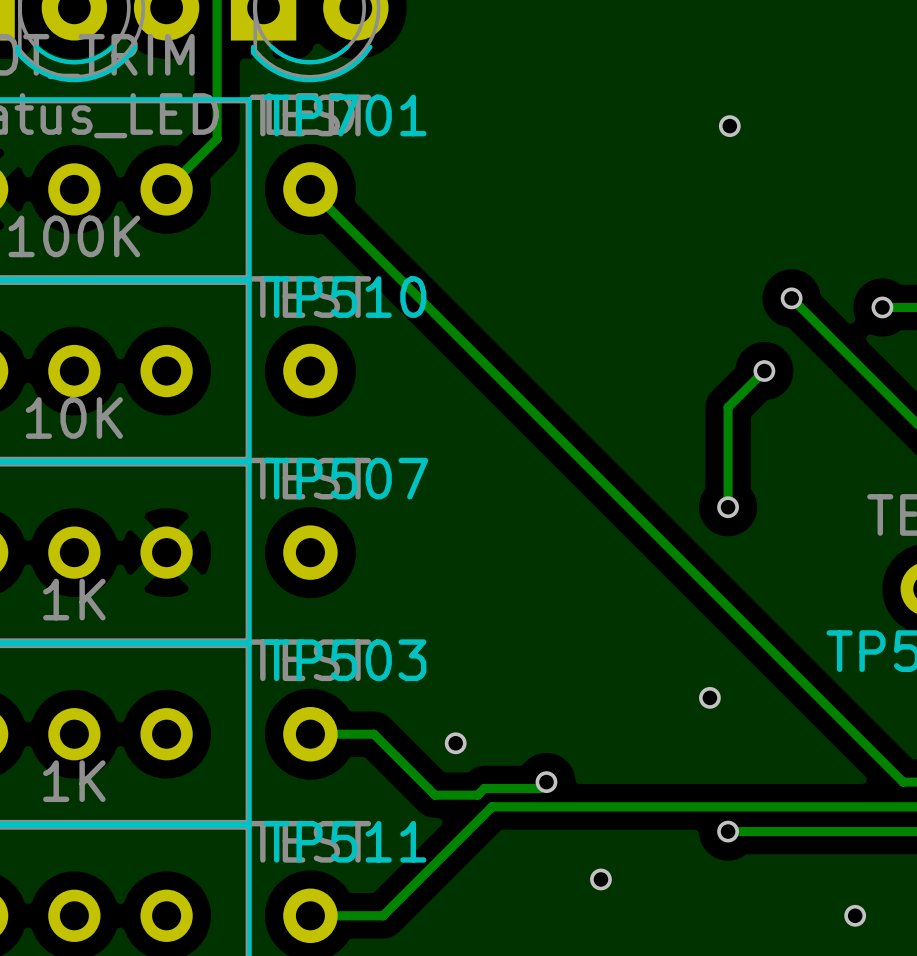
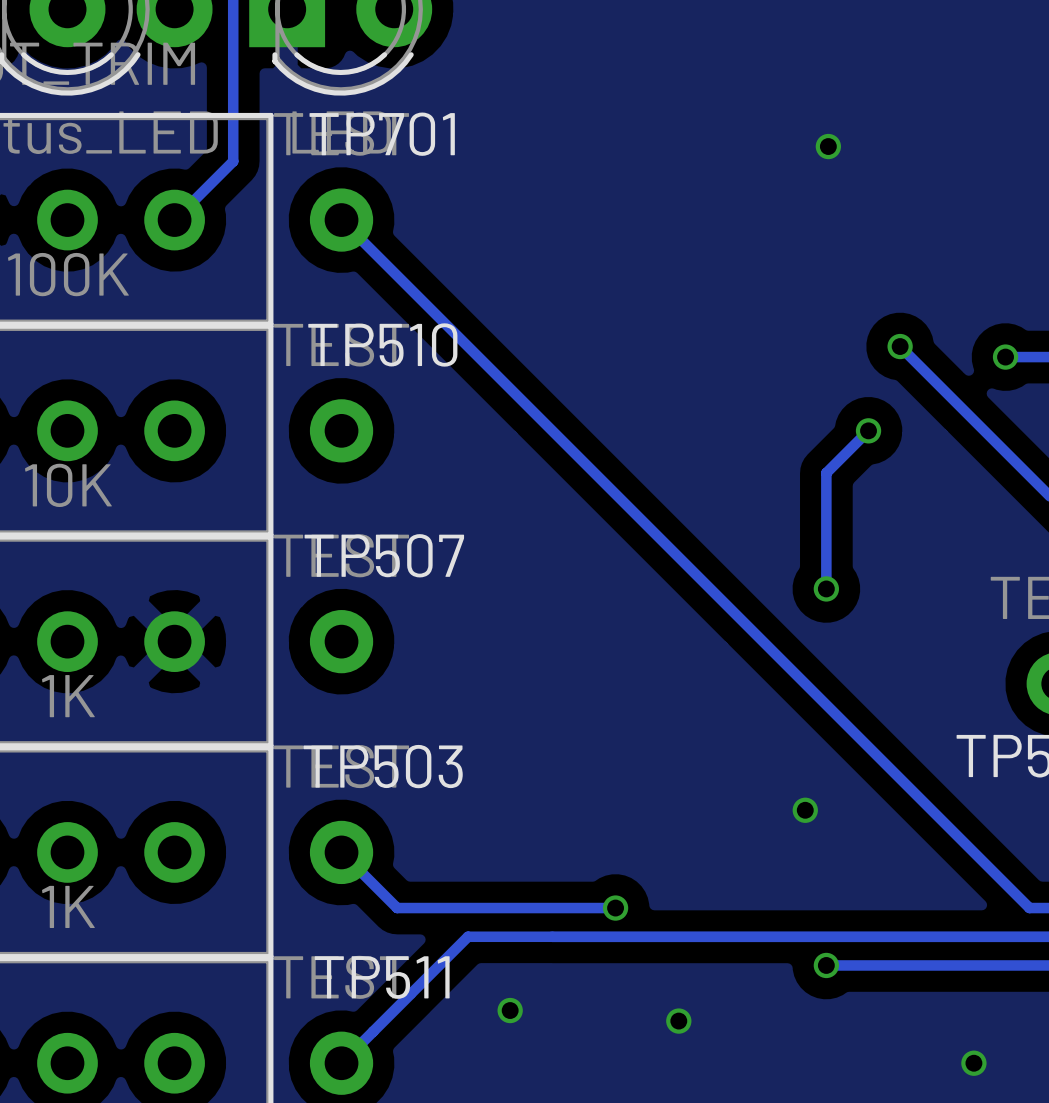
track: (310, 734) (373, 734) (434, 795) (477, 795) (484, 788) (540, 788) (546, 782) -> (341, 852) (397, 908) (615, 908)
via position: (455, 743) -> (510, 1010)
track: (492, 806) (383, 915) (310, 915) -> (552, 936) (468, 936) (341, 1063)

